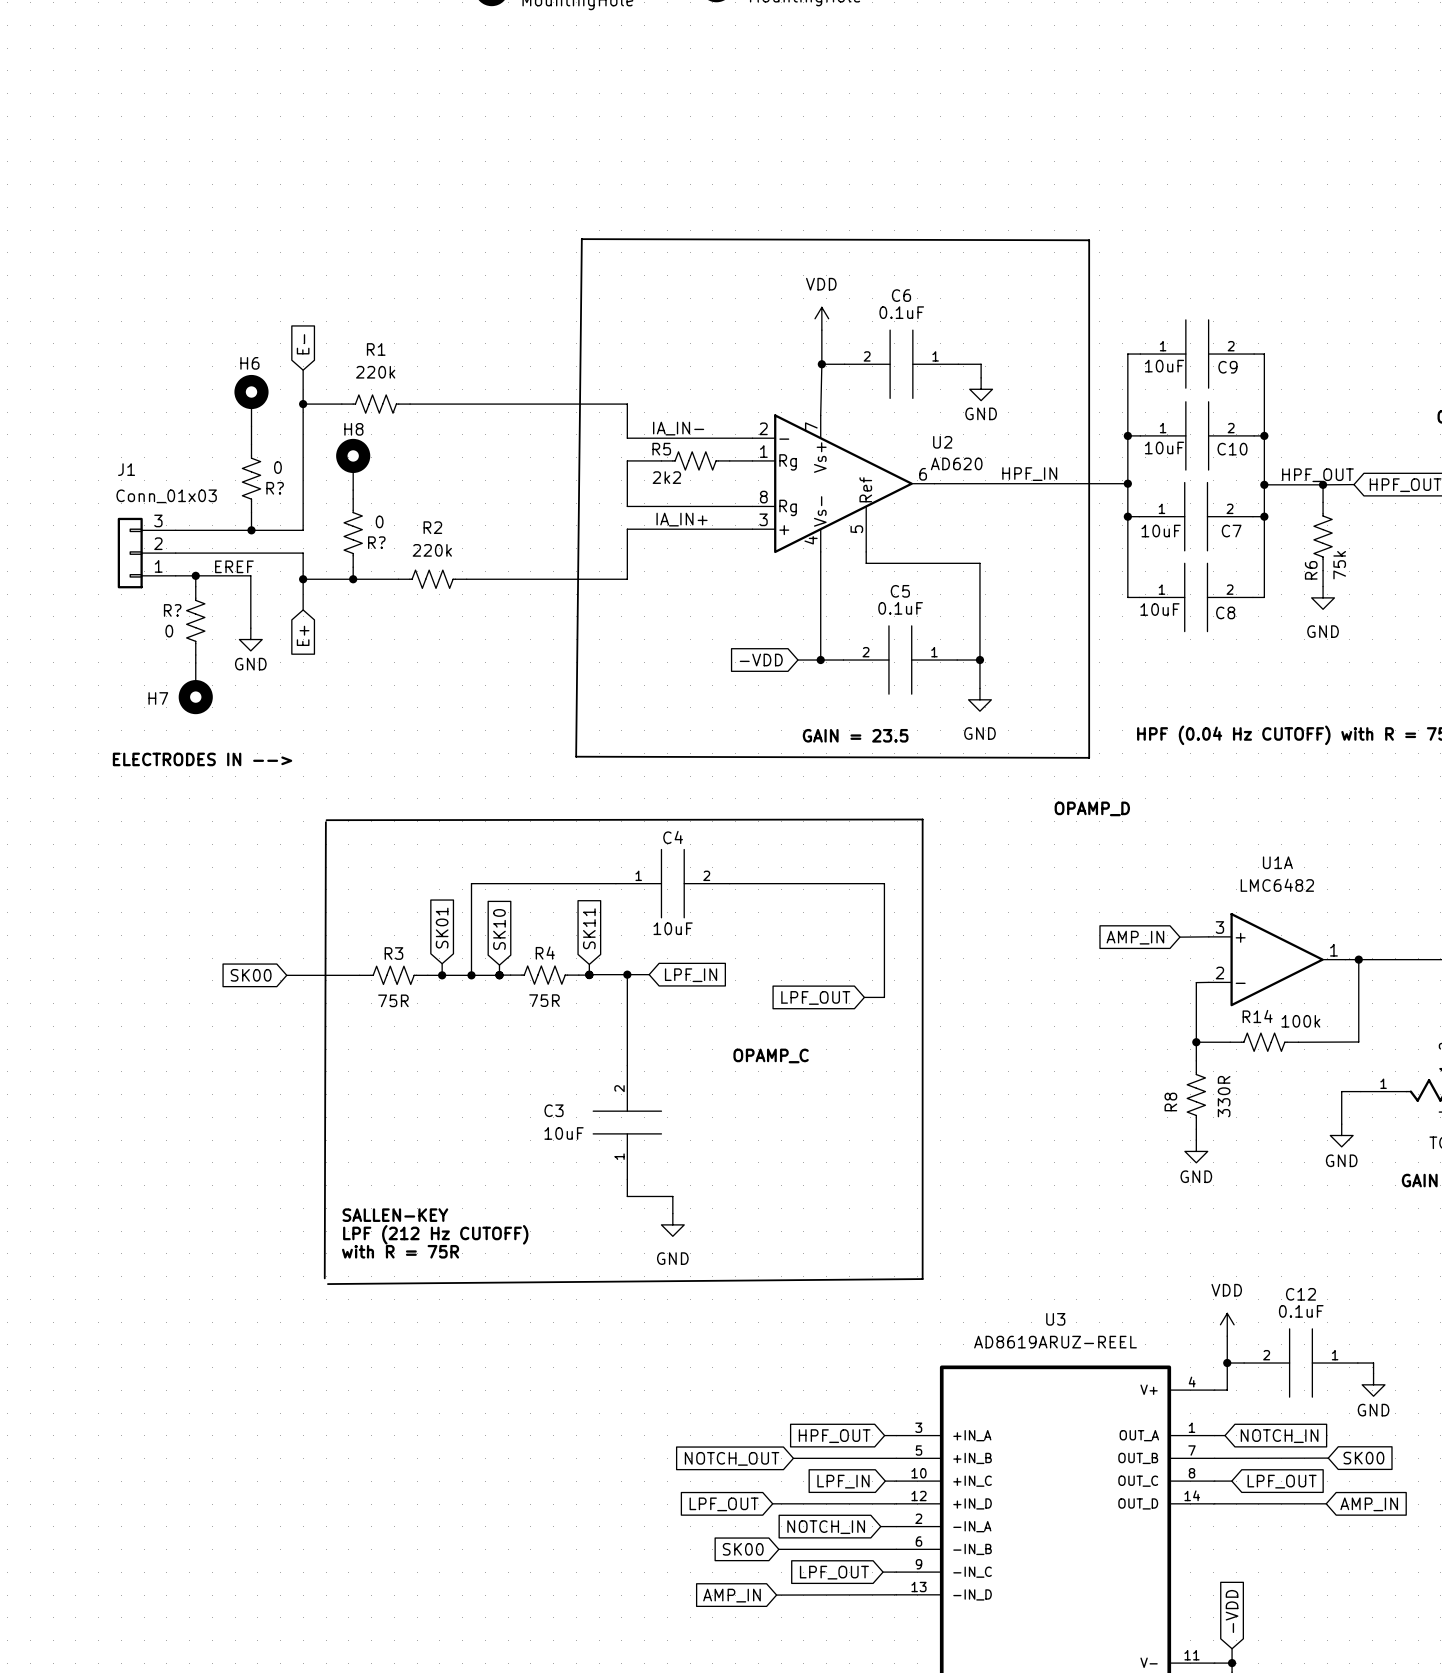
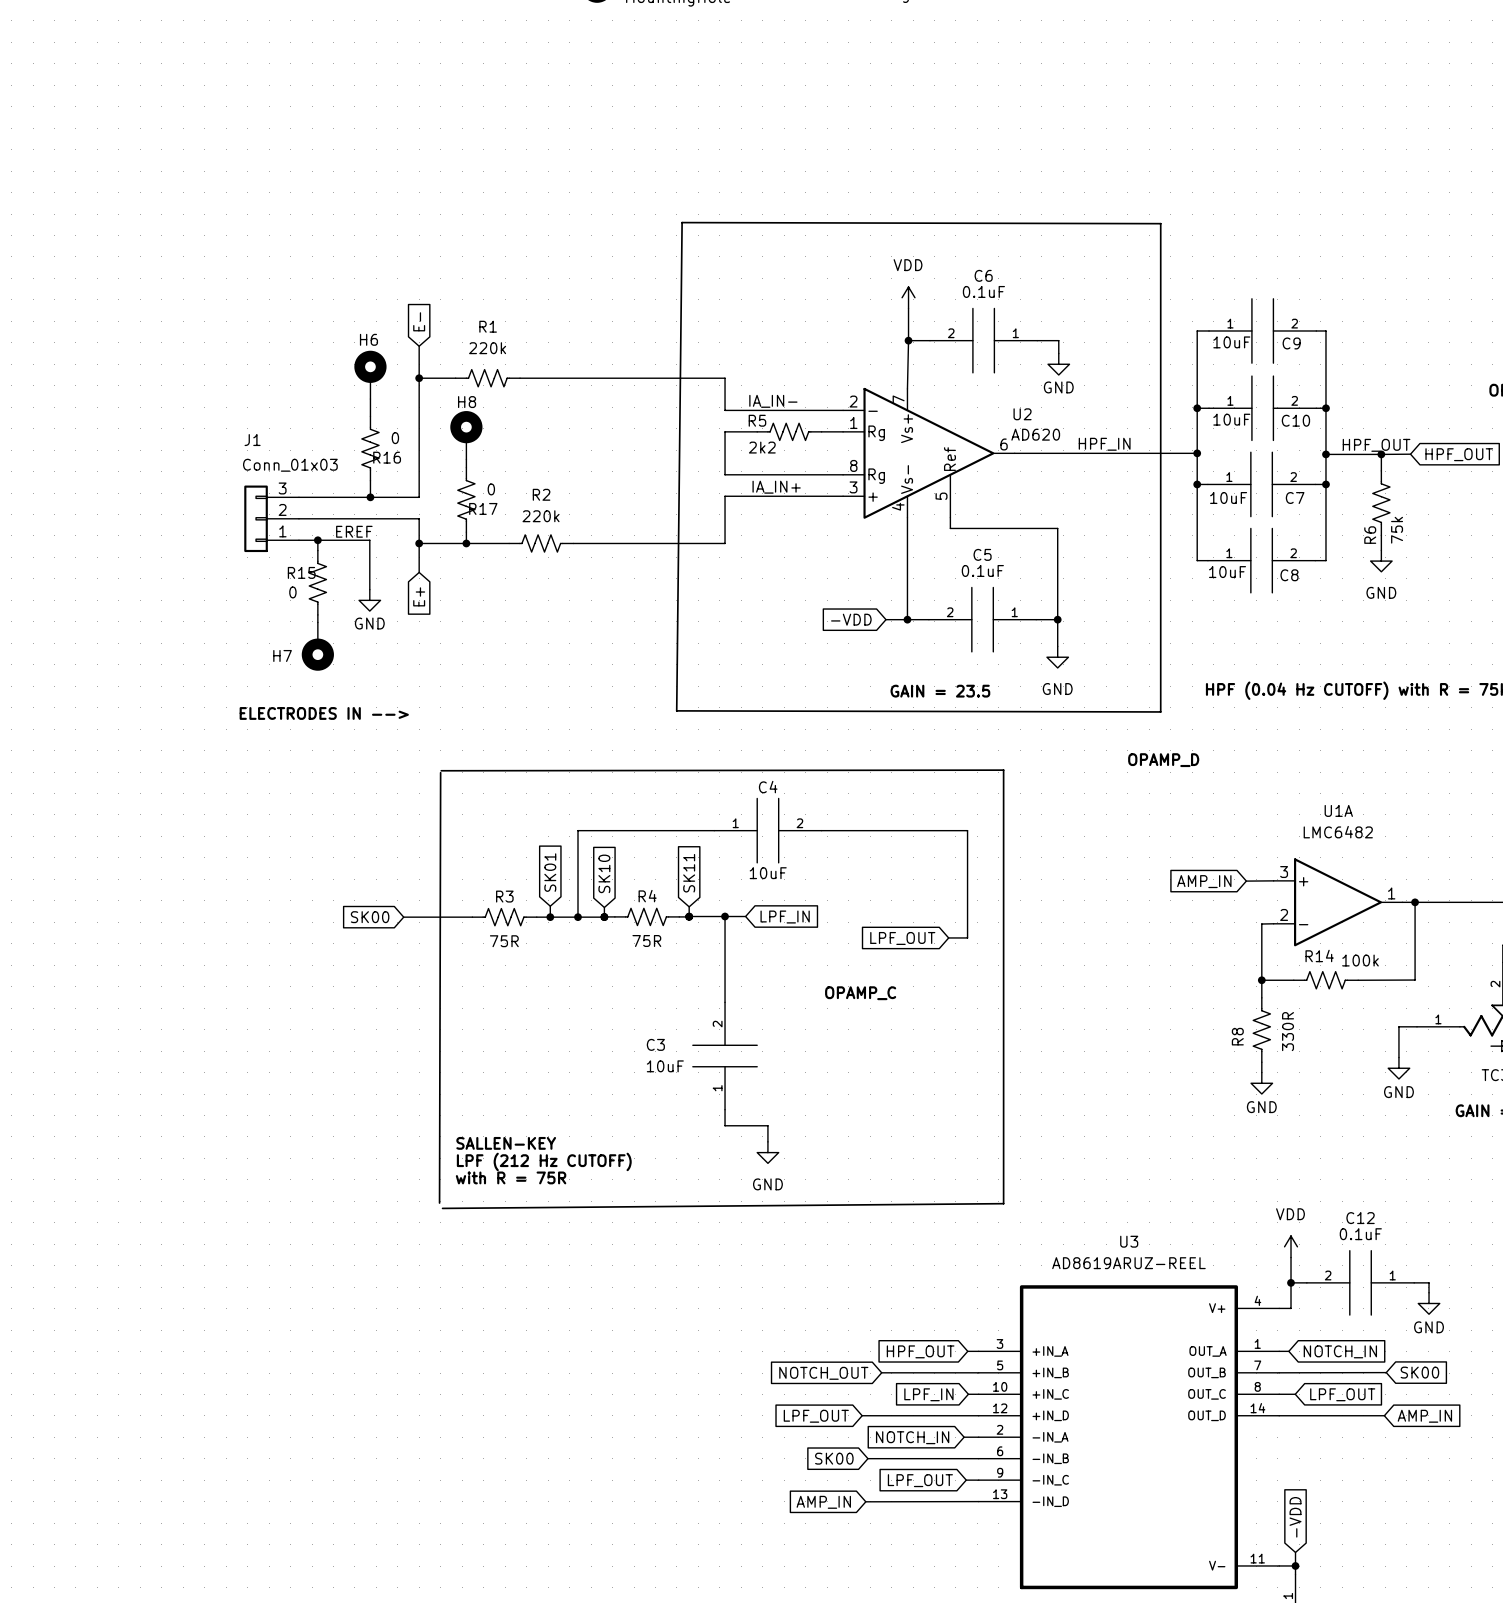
R? name: R? (275, 488) -> R16 (387, 457)
R? name: R? (376, 542) -> R17 (483, 508)
R? name: R? (172, 610) -> R15 (301, 572)

